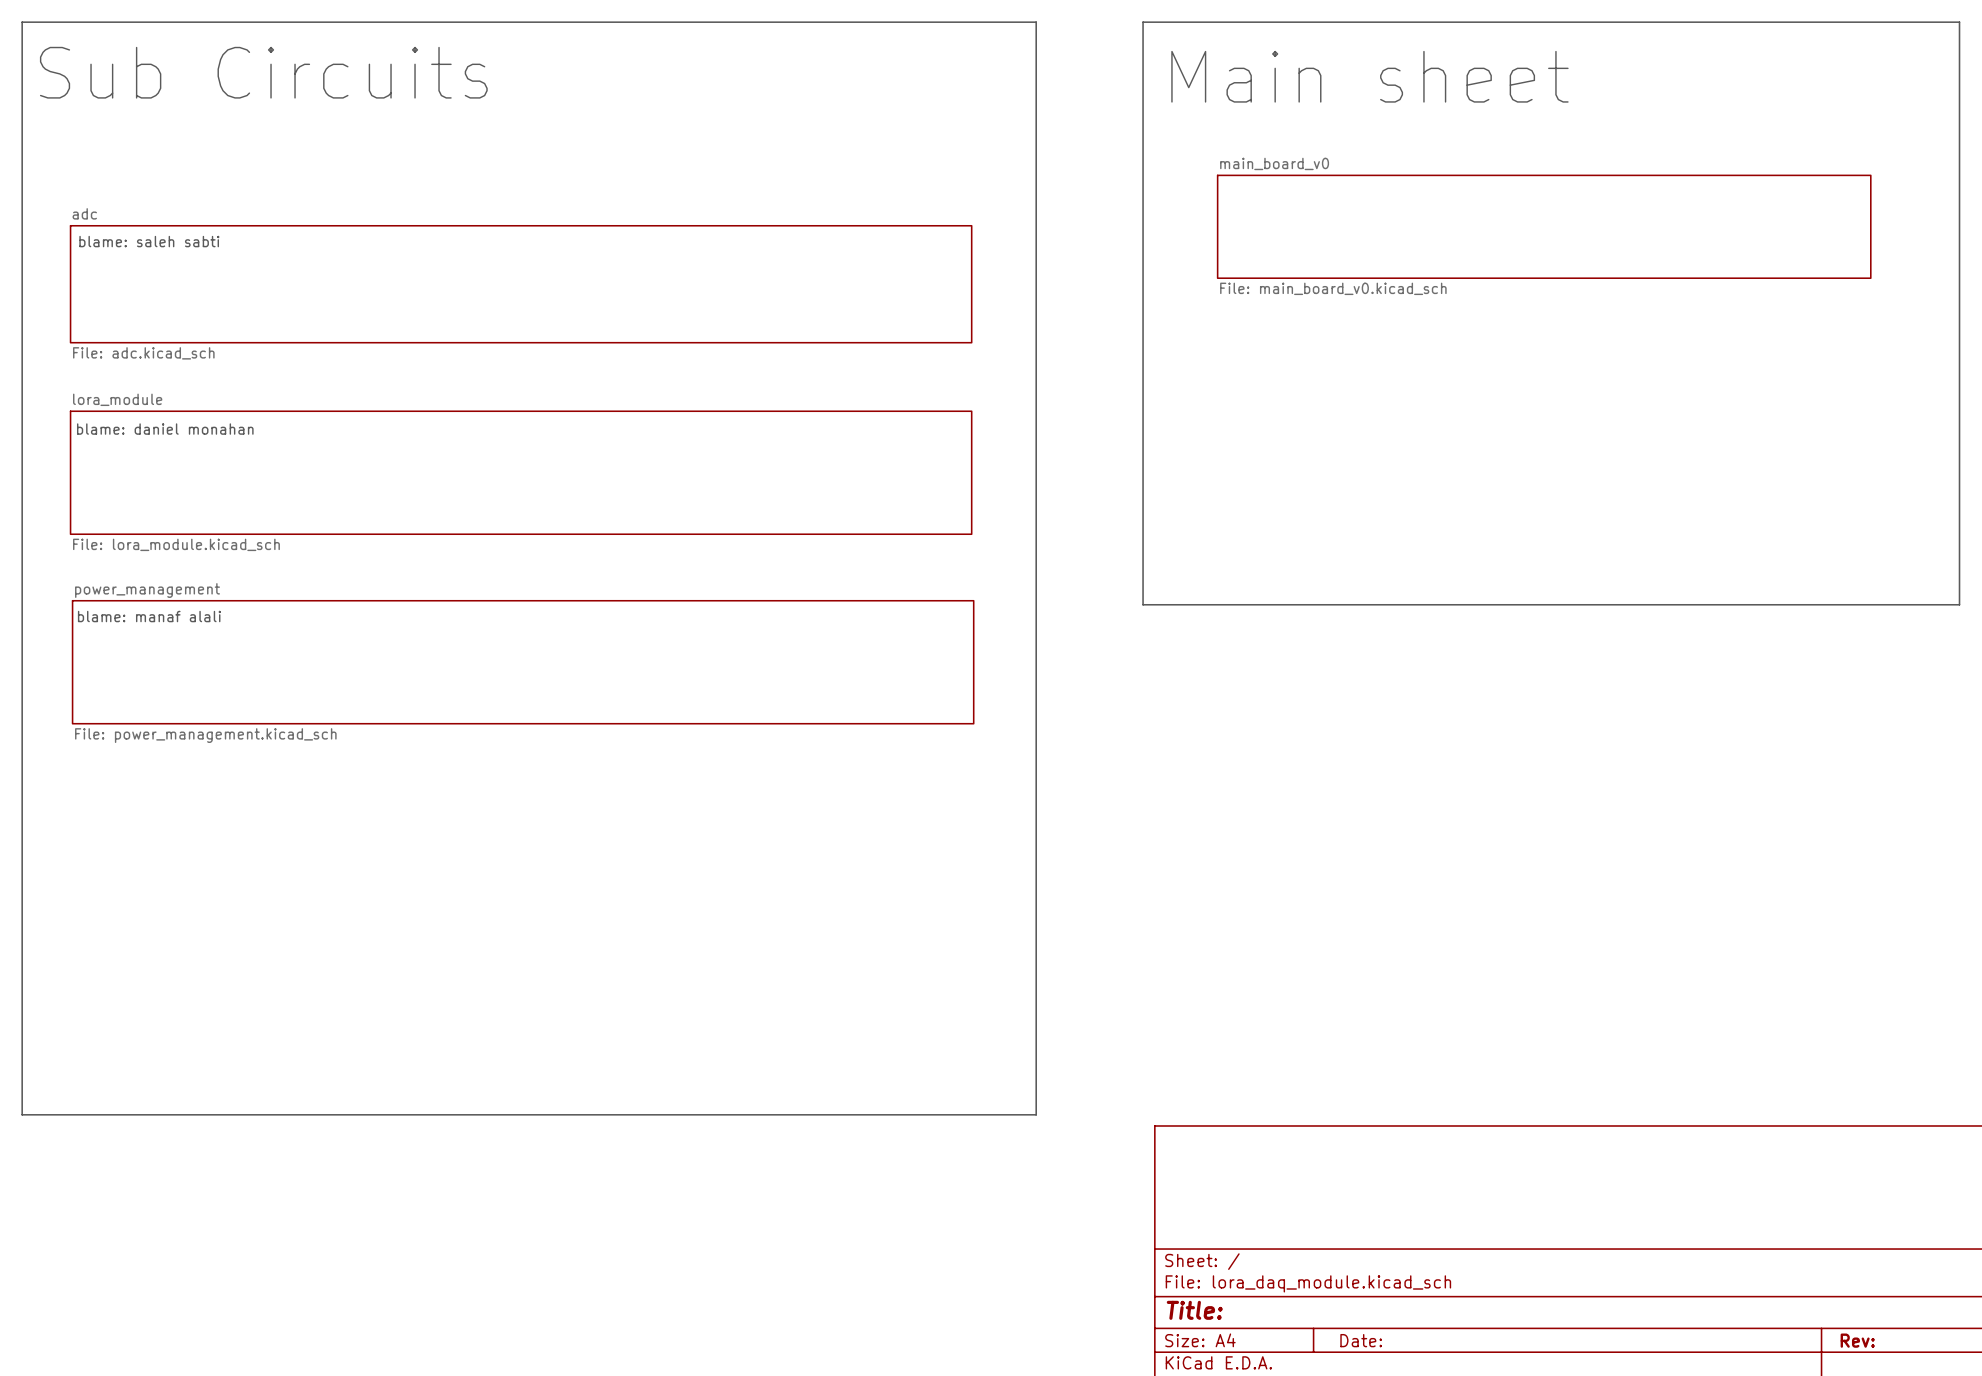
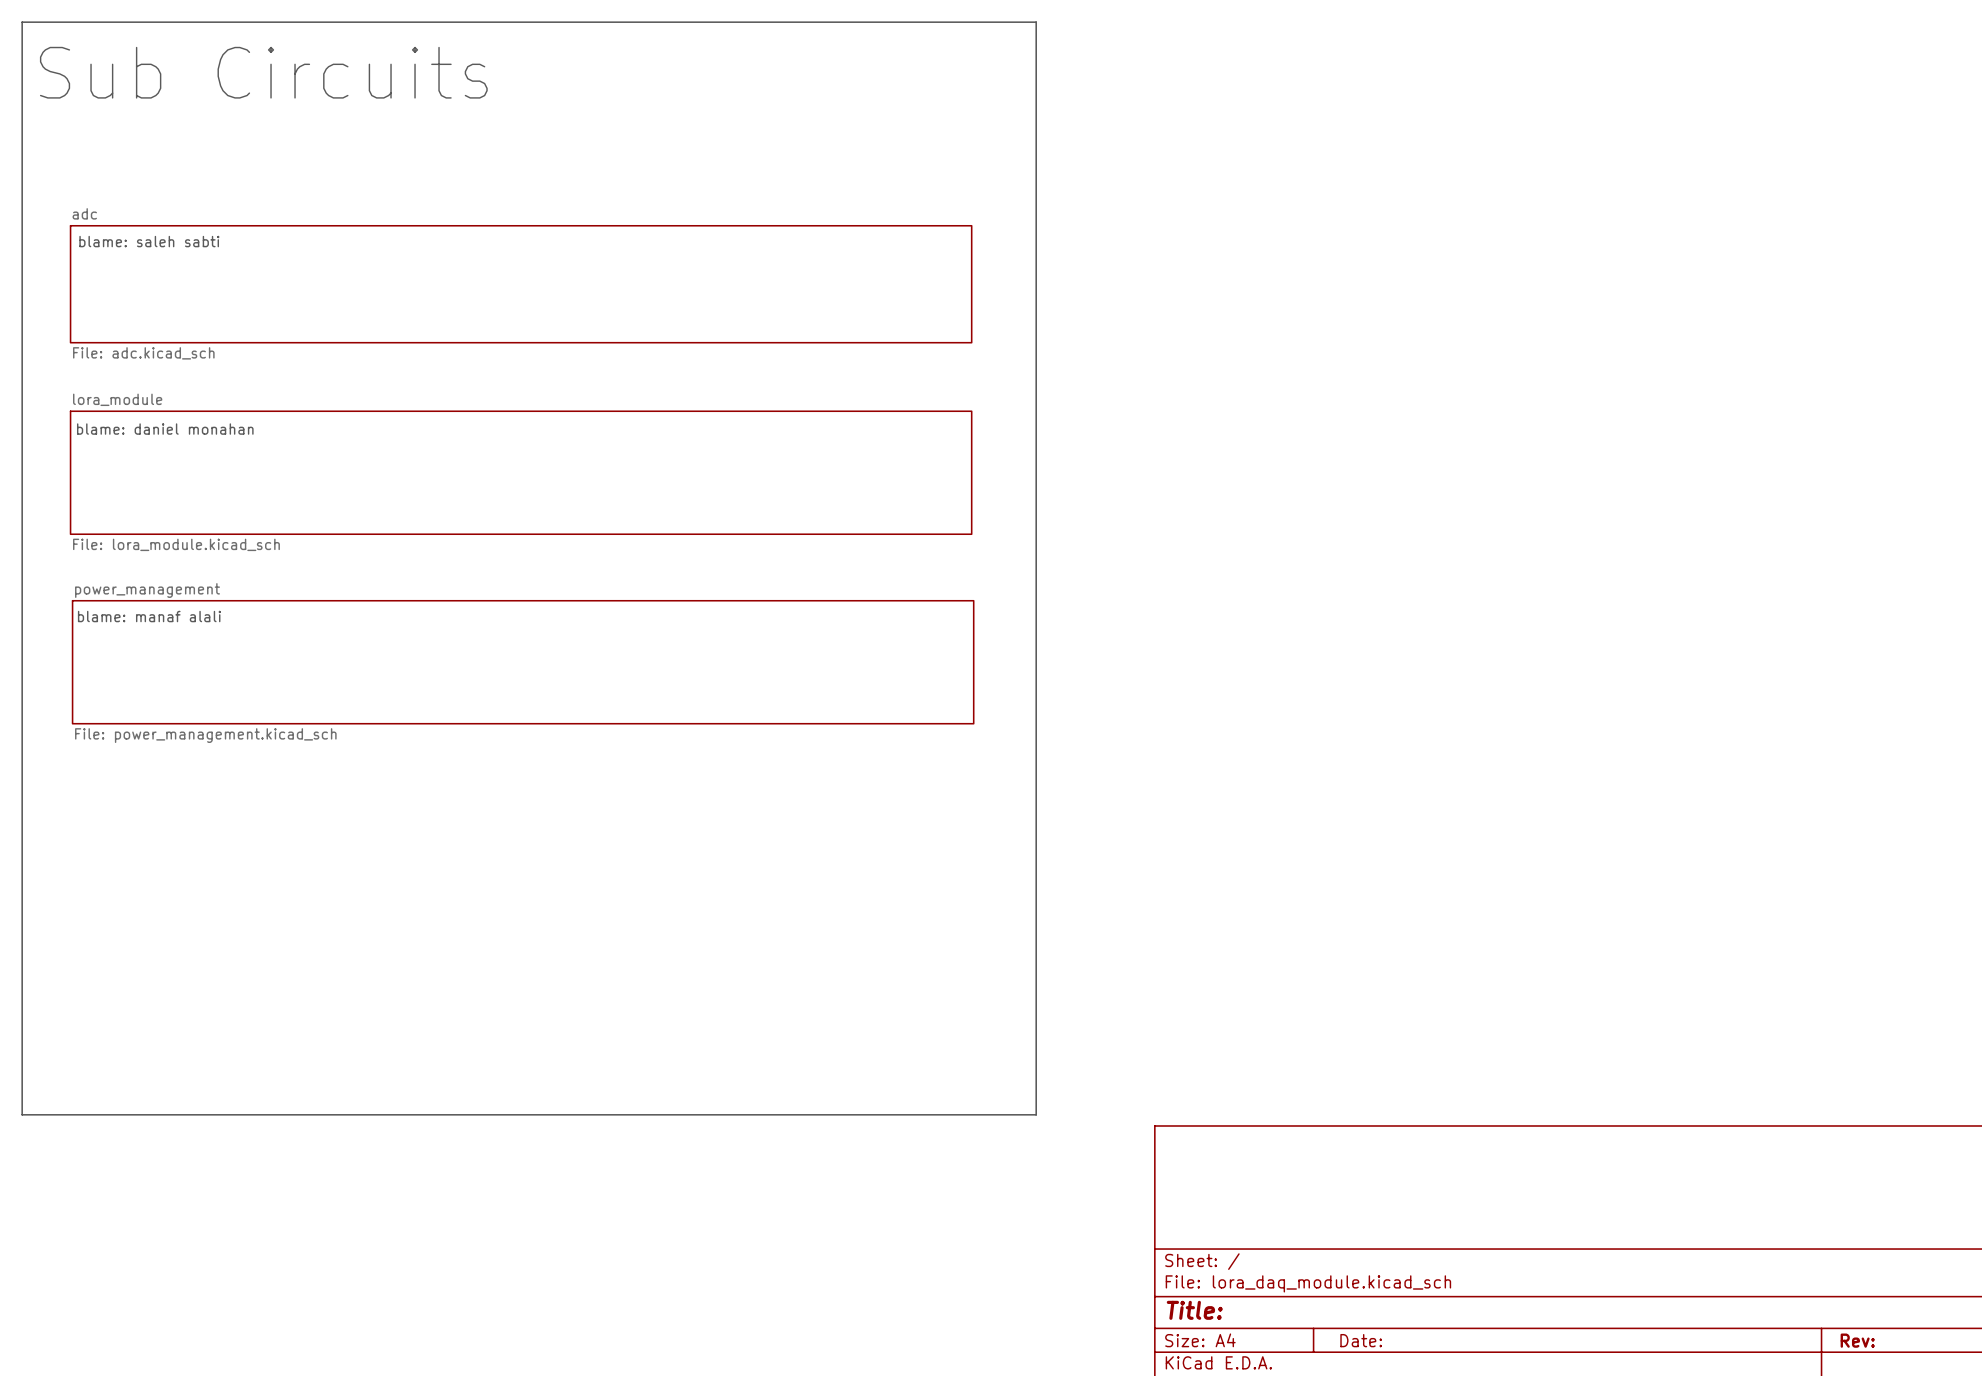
line: (1143, 22) (1959, 22) (1959, 604) (1143, 604) (1143, 22) -> none
text: Main sheet (1369, 76) -> none
sheet main_board_v0: File: main_board_v0.kicad_sch (1544, 226) -> none

